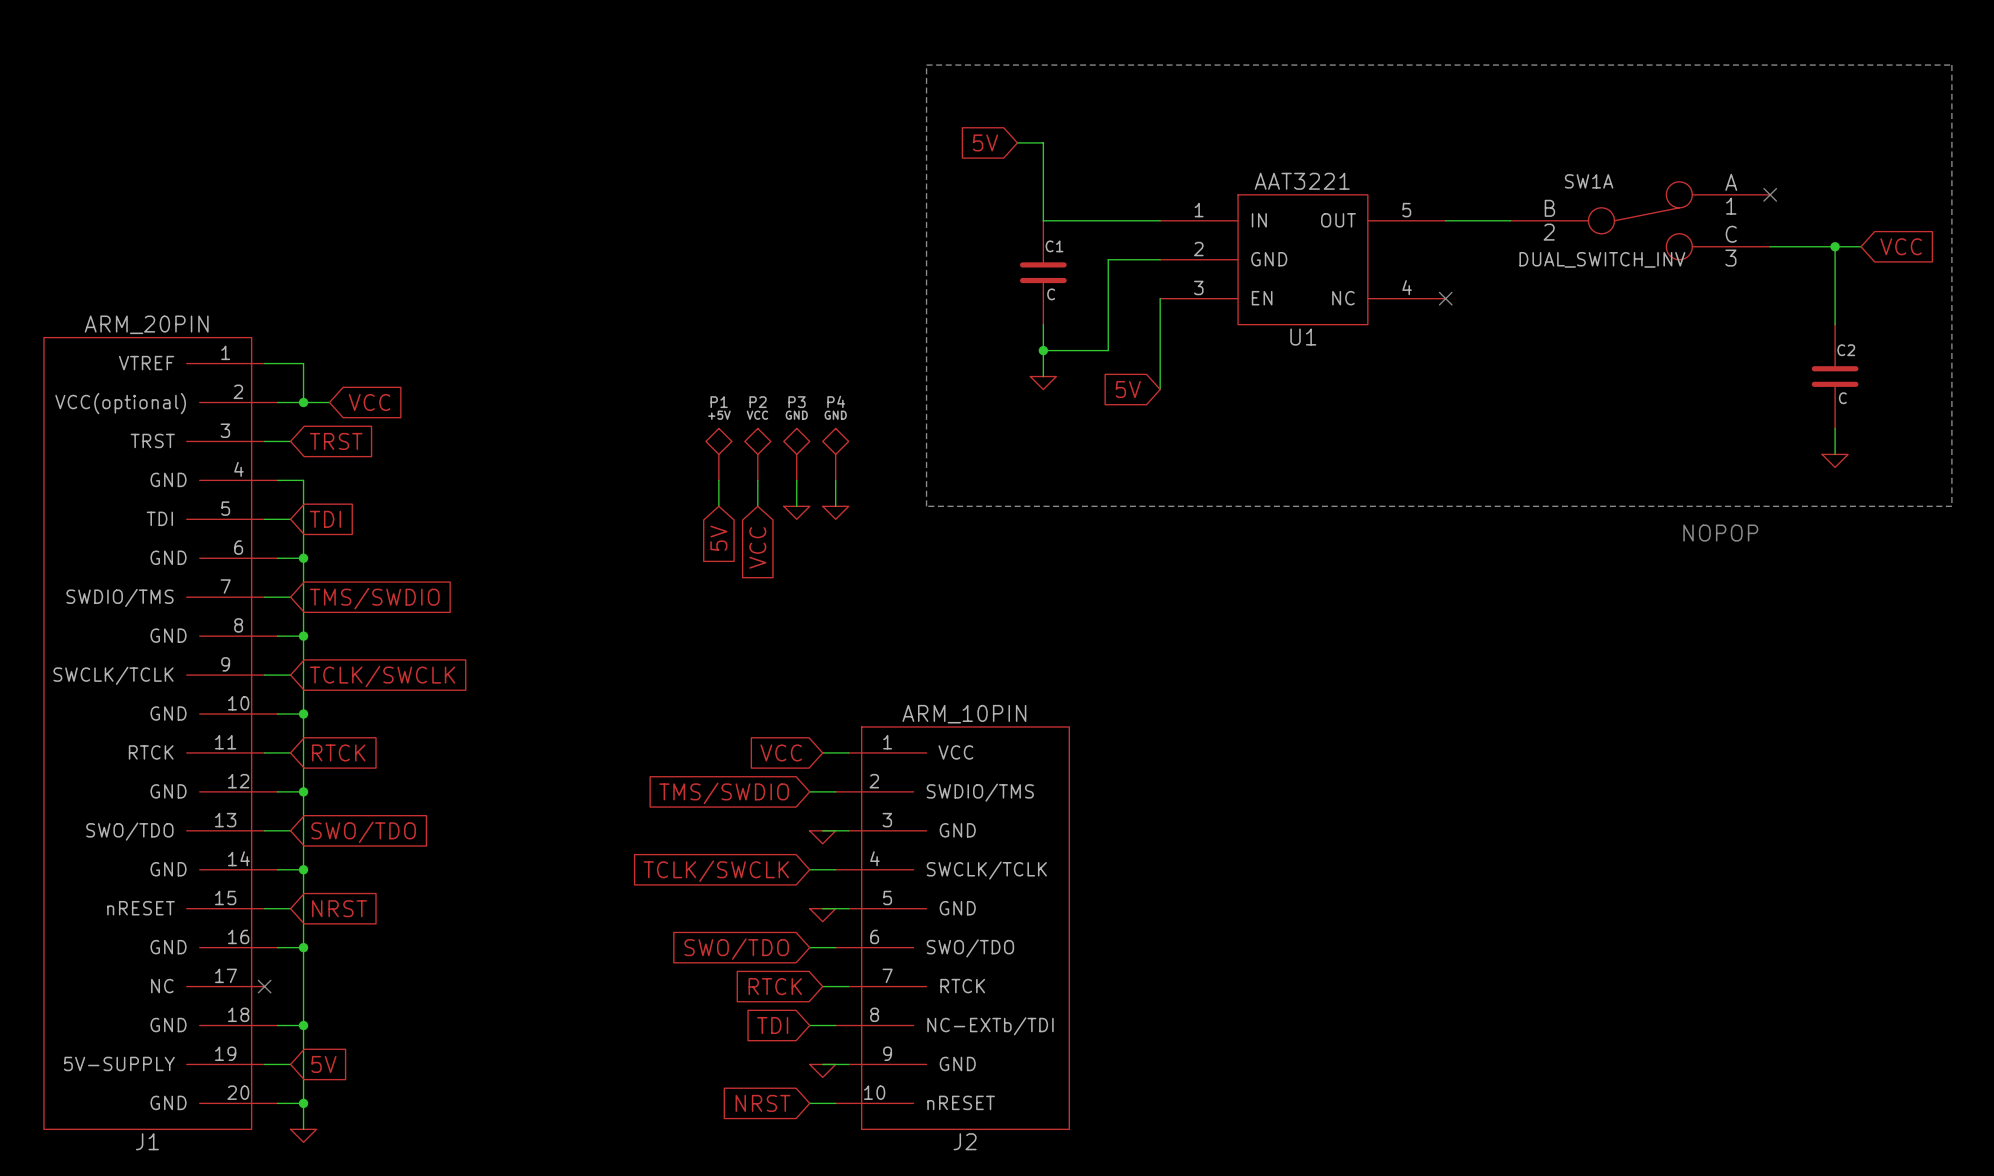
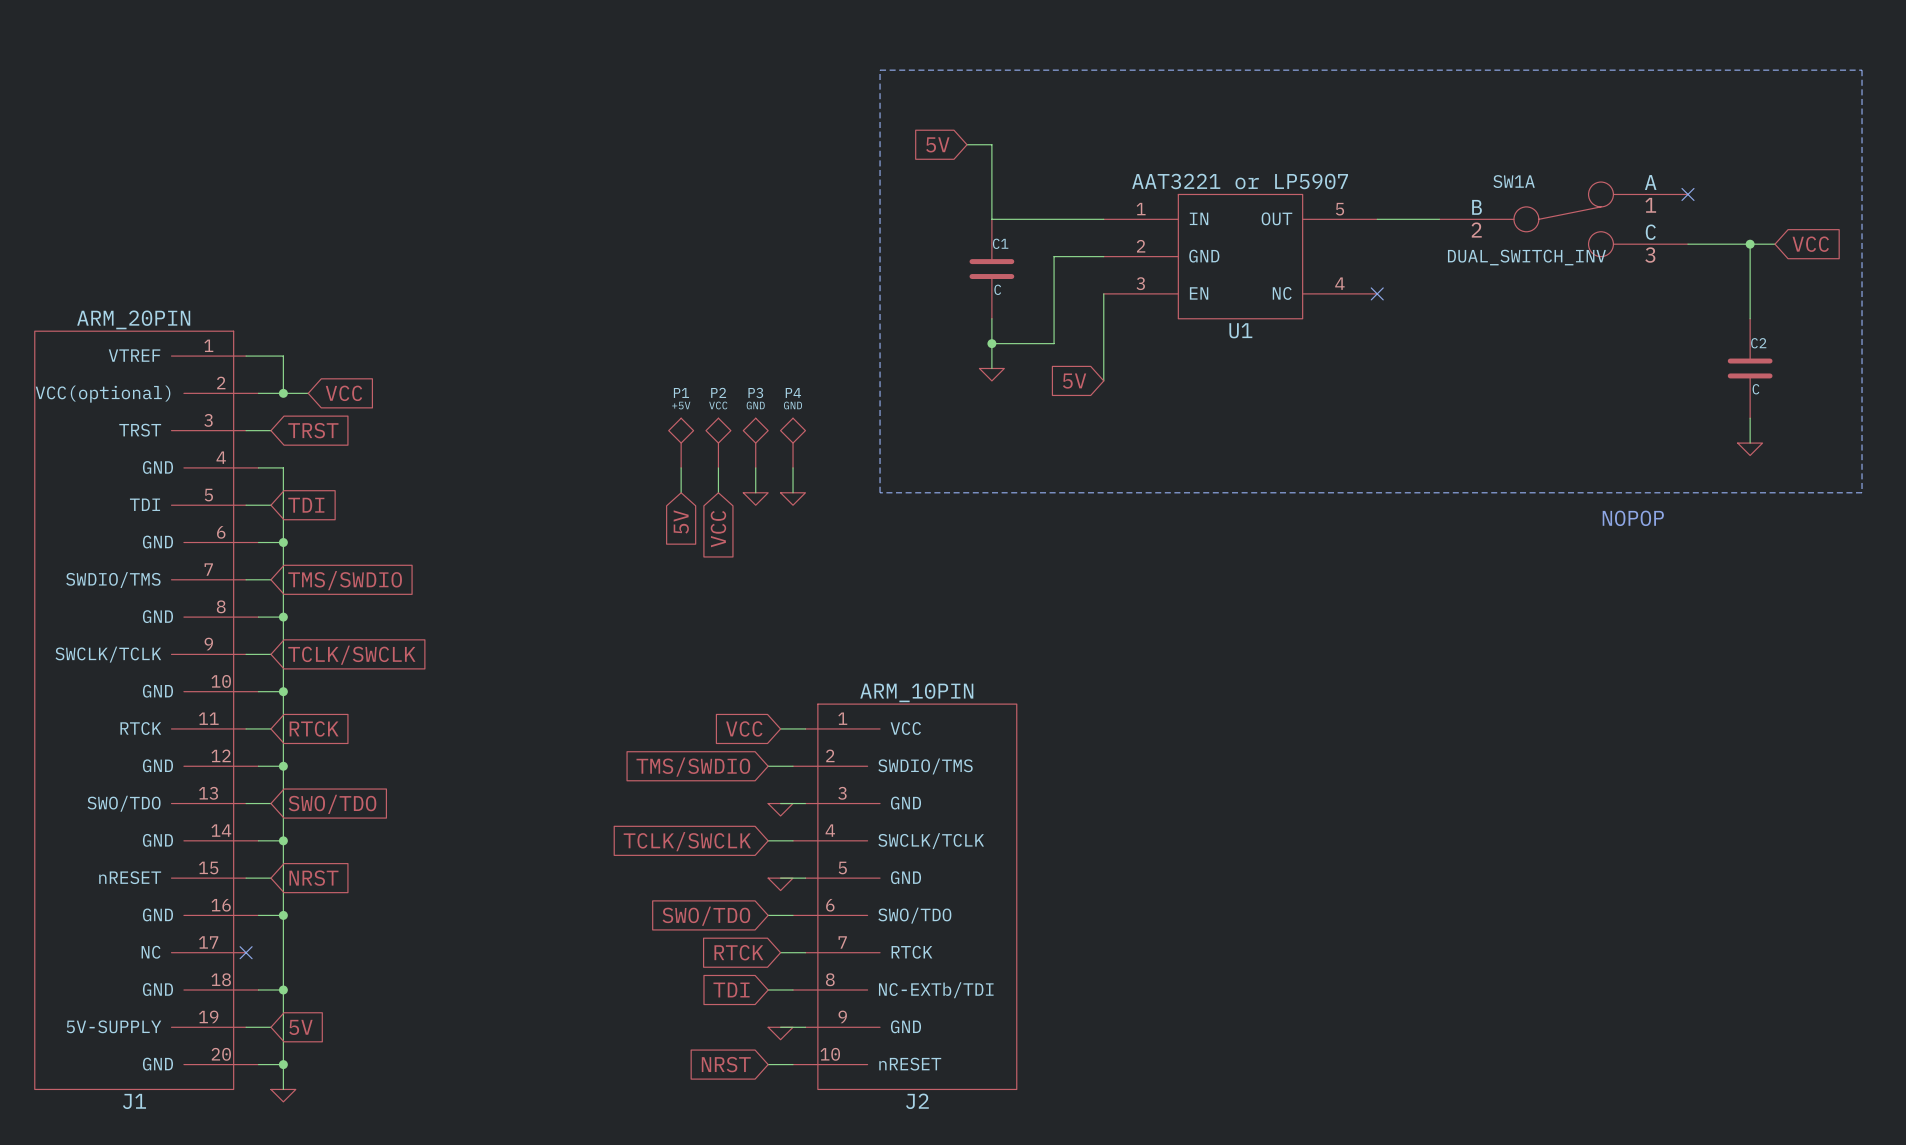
U1 value: AAT3221 (1302, 181) -> AAT3221 or LP5907 (1240, 181)

